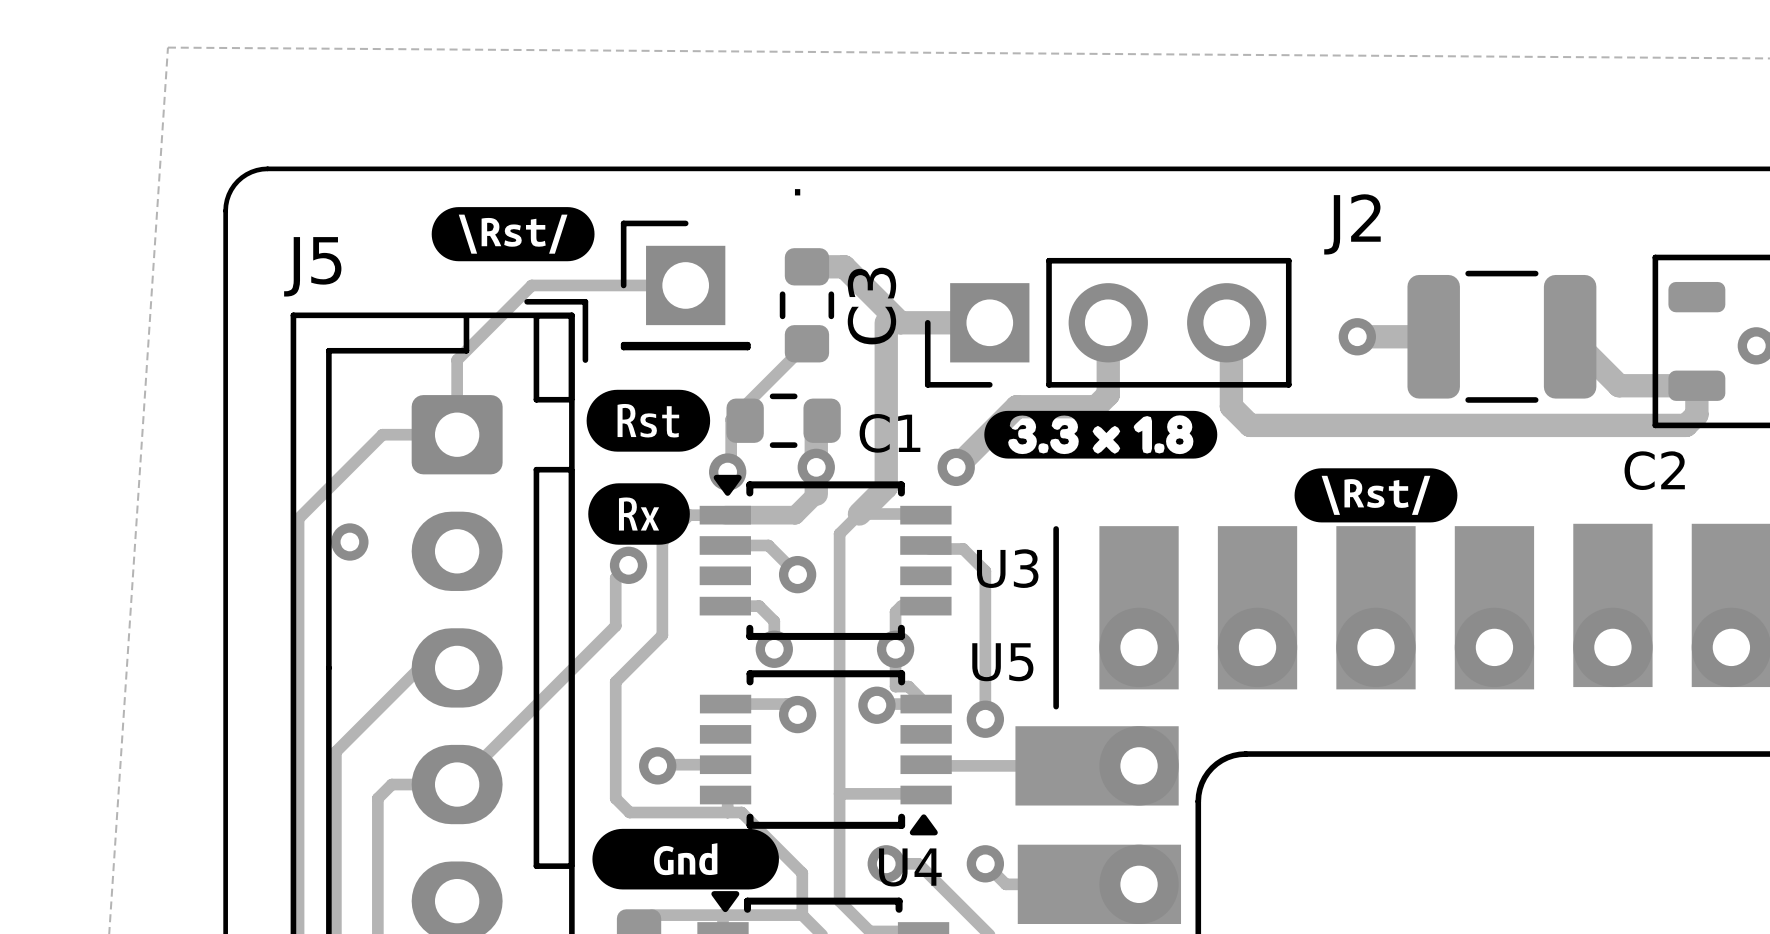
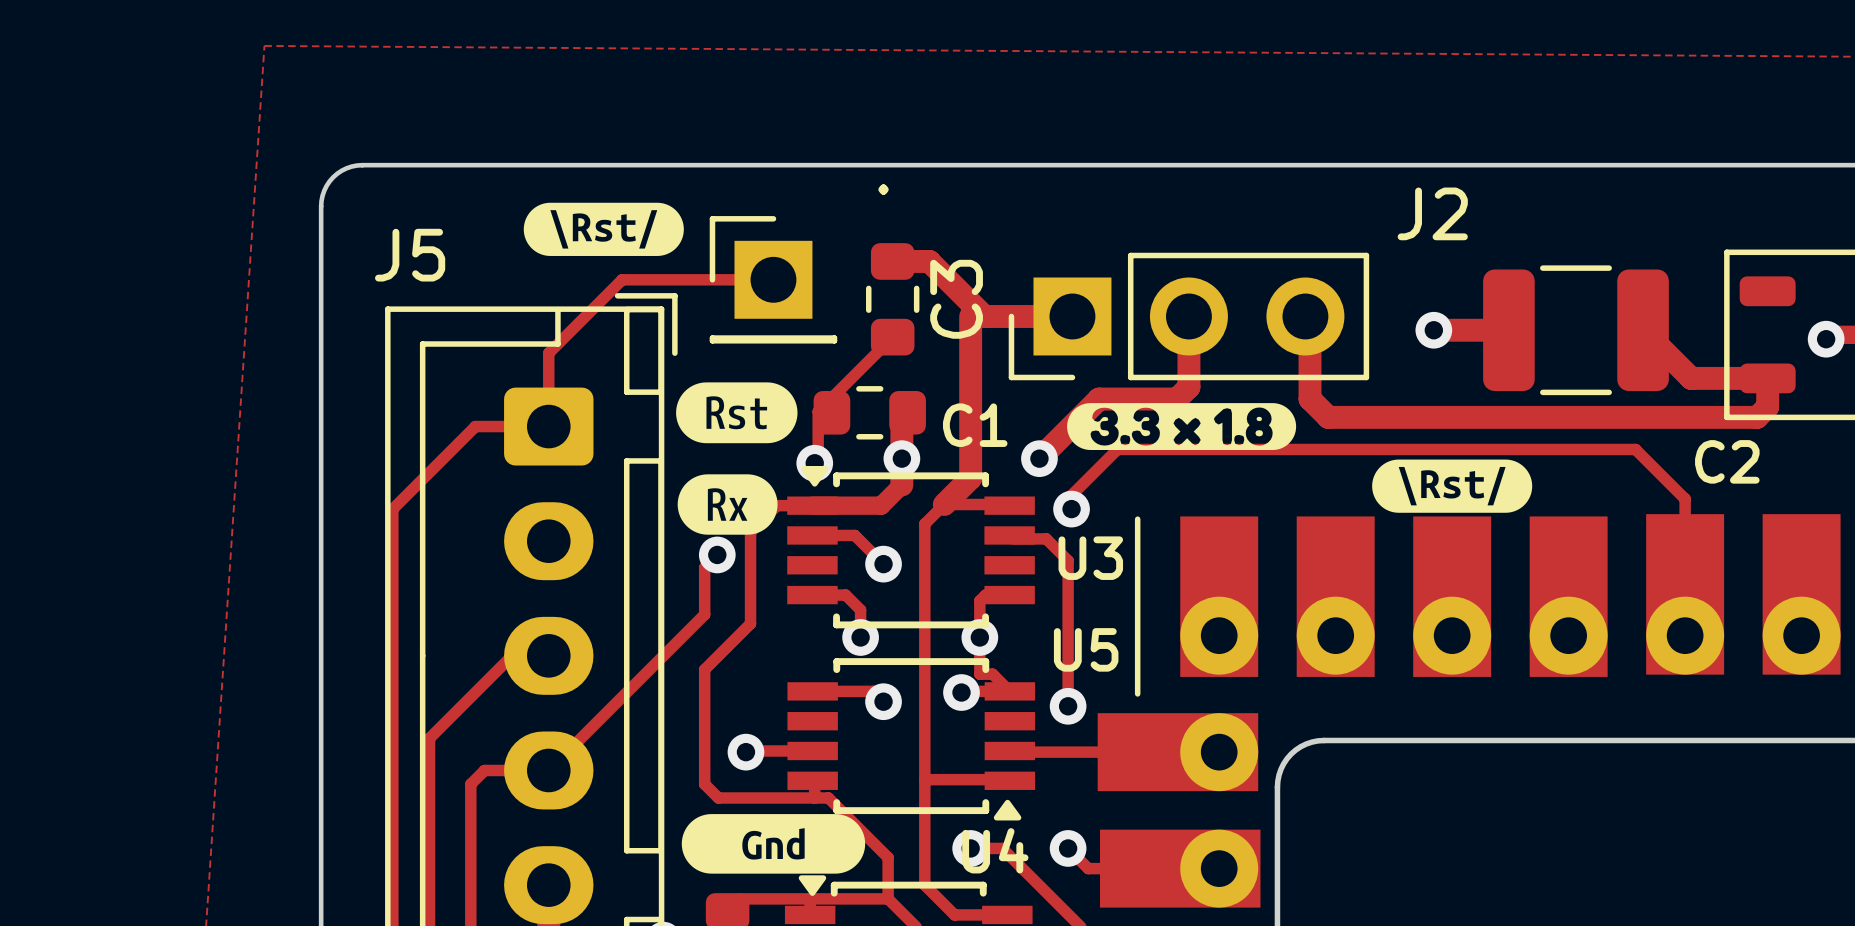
track: none -> (1071, 509) (1071, 495) (1117, 449) (1635, 449) (1685, 499) (1685, 594)
via: none -> (1071, 509)
via: (349, 541) -> none

